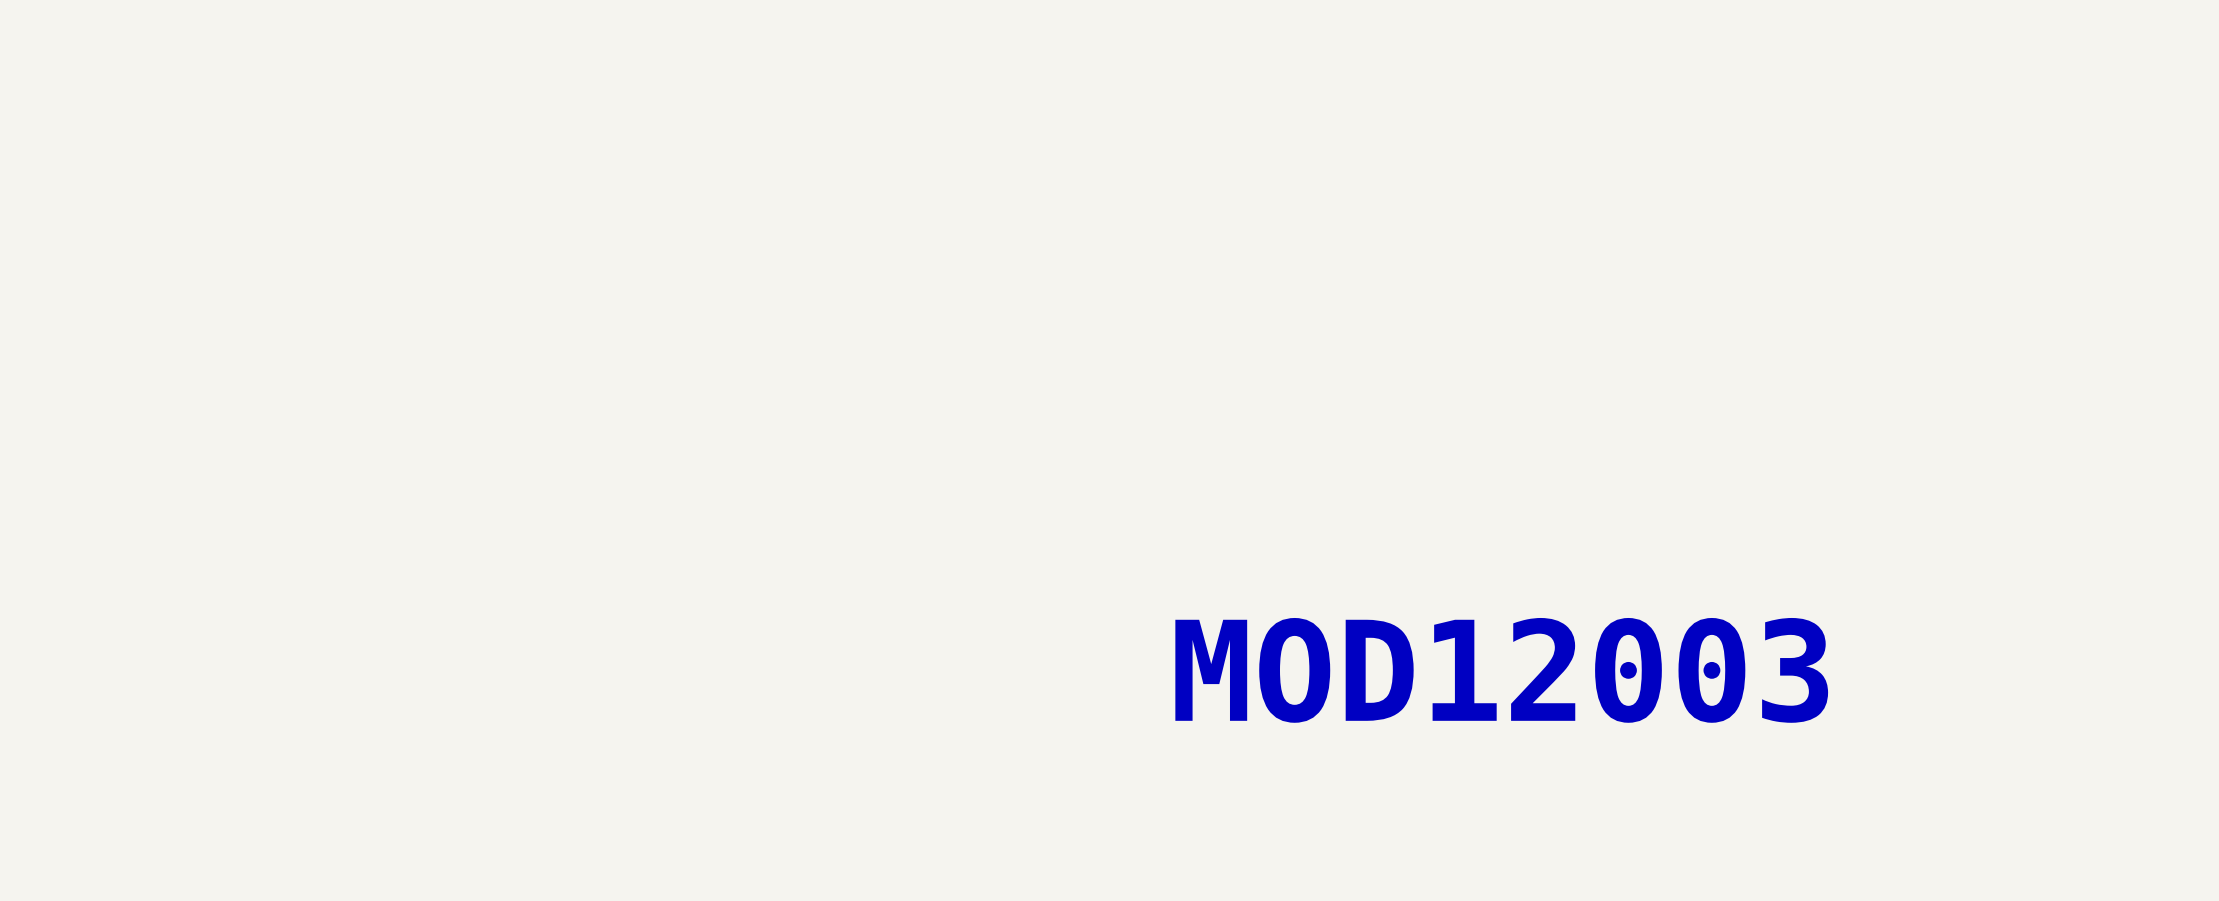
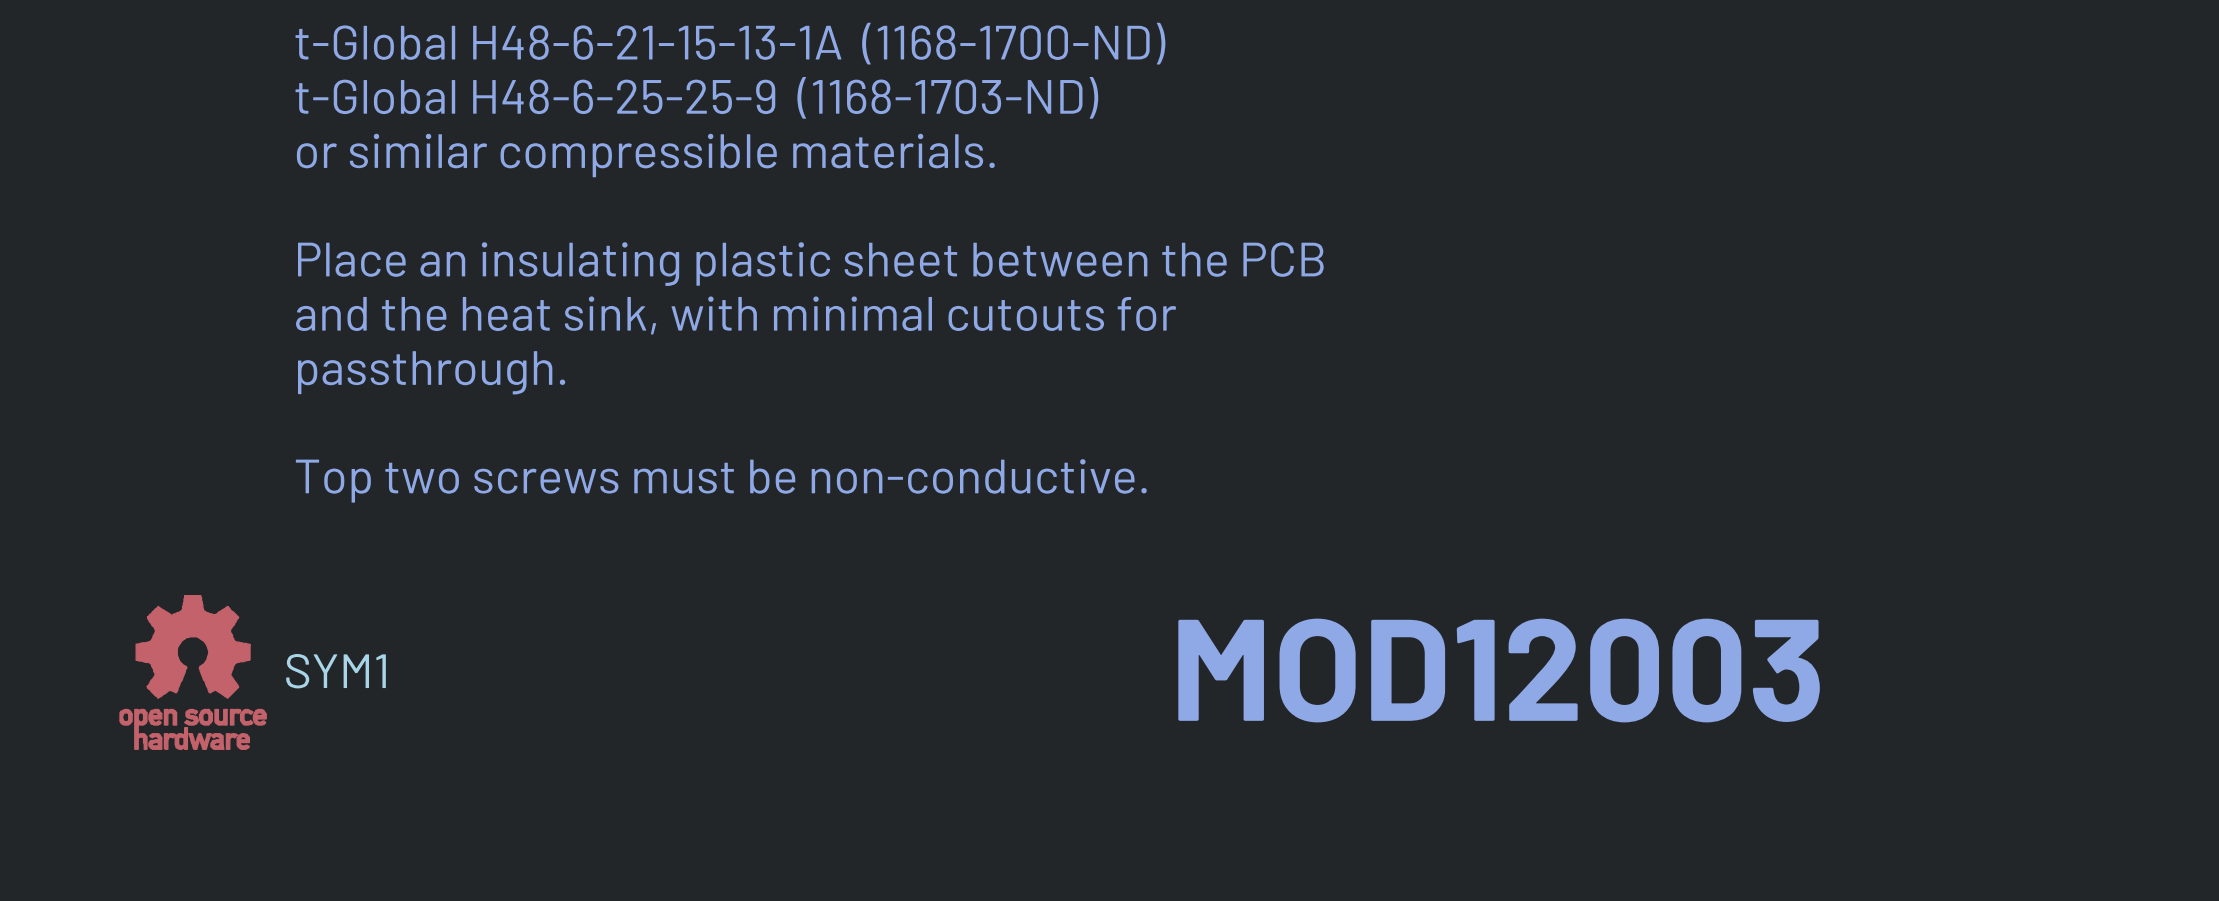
text: none -> t-Global H48-6-21-15-13-1A (1168-1700-ND) (730, 43)
text: none -> t-Global H48-6-25-25-9 (1168-1703-ND) (696, 97)
text: none -> or similar compressible materials. (645, 155)
text: none -> Place an insulating plastic sheet between the PCB (810, 264)
text: none -> and the heat sink, with minimal cutouts for (736, 315)
text: none -> passthrough. (431, 372)
text: none -> Top two screws must be non-conductive. (721, 480)
SYM1: none -> (193, 672)

